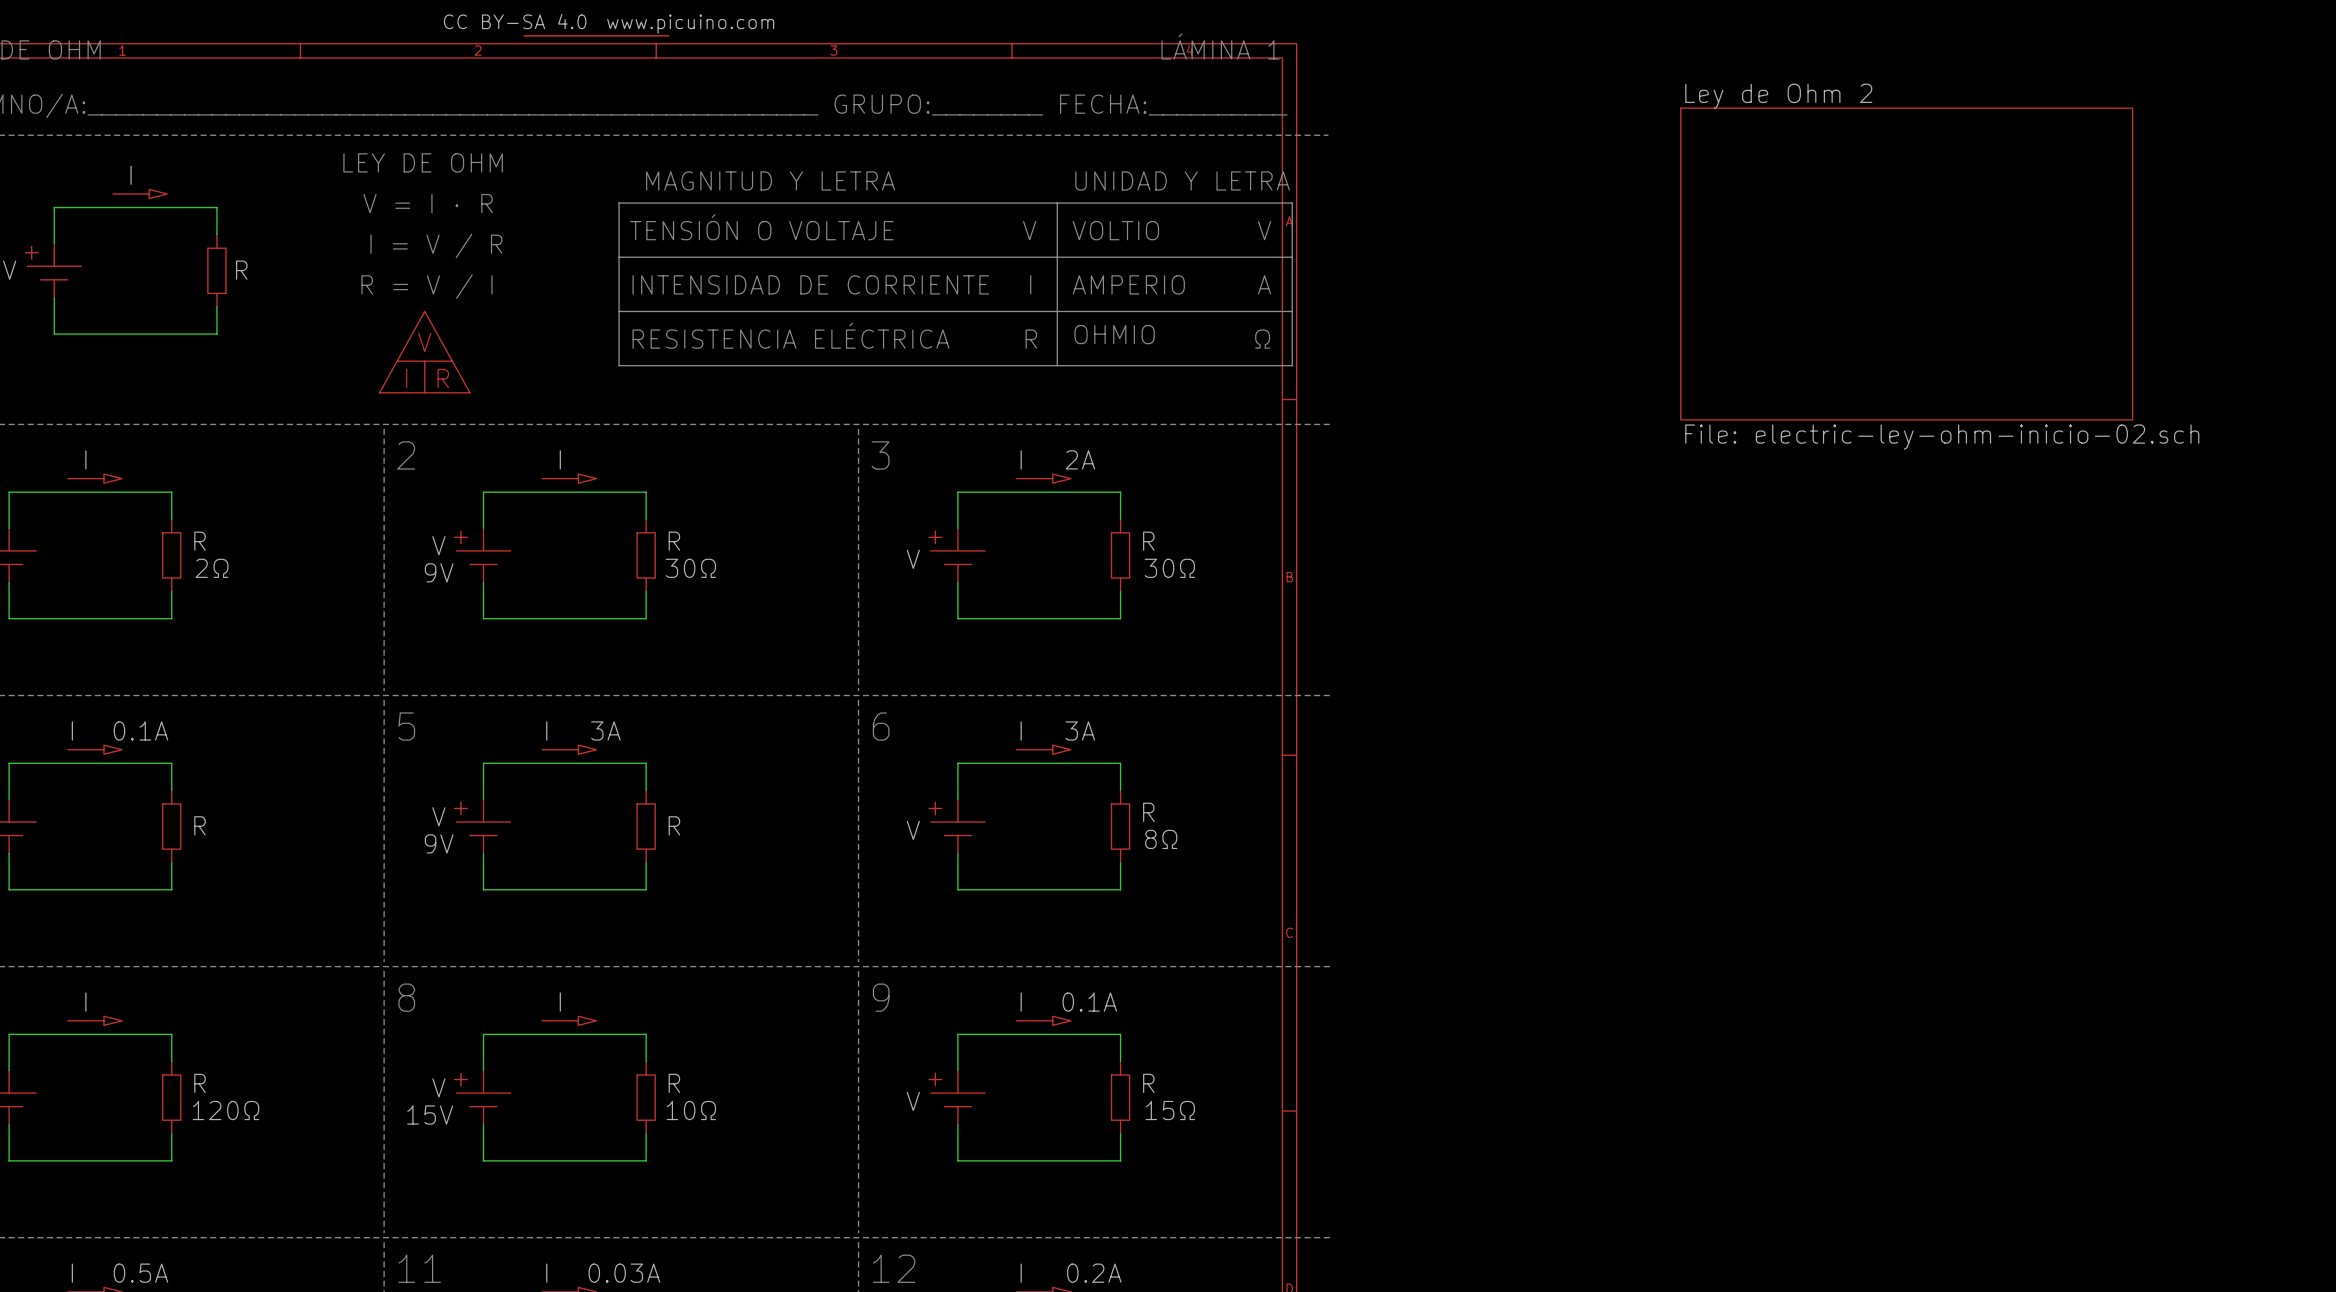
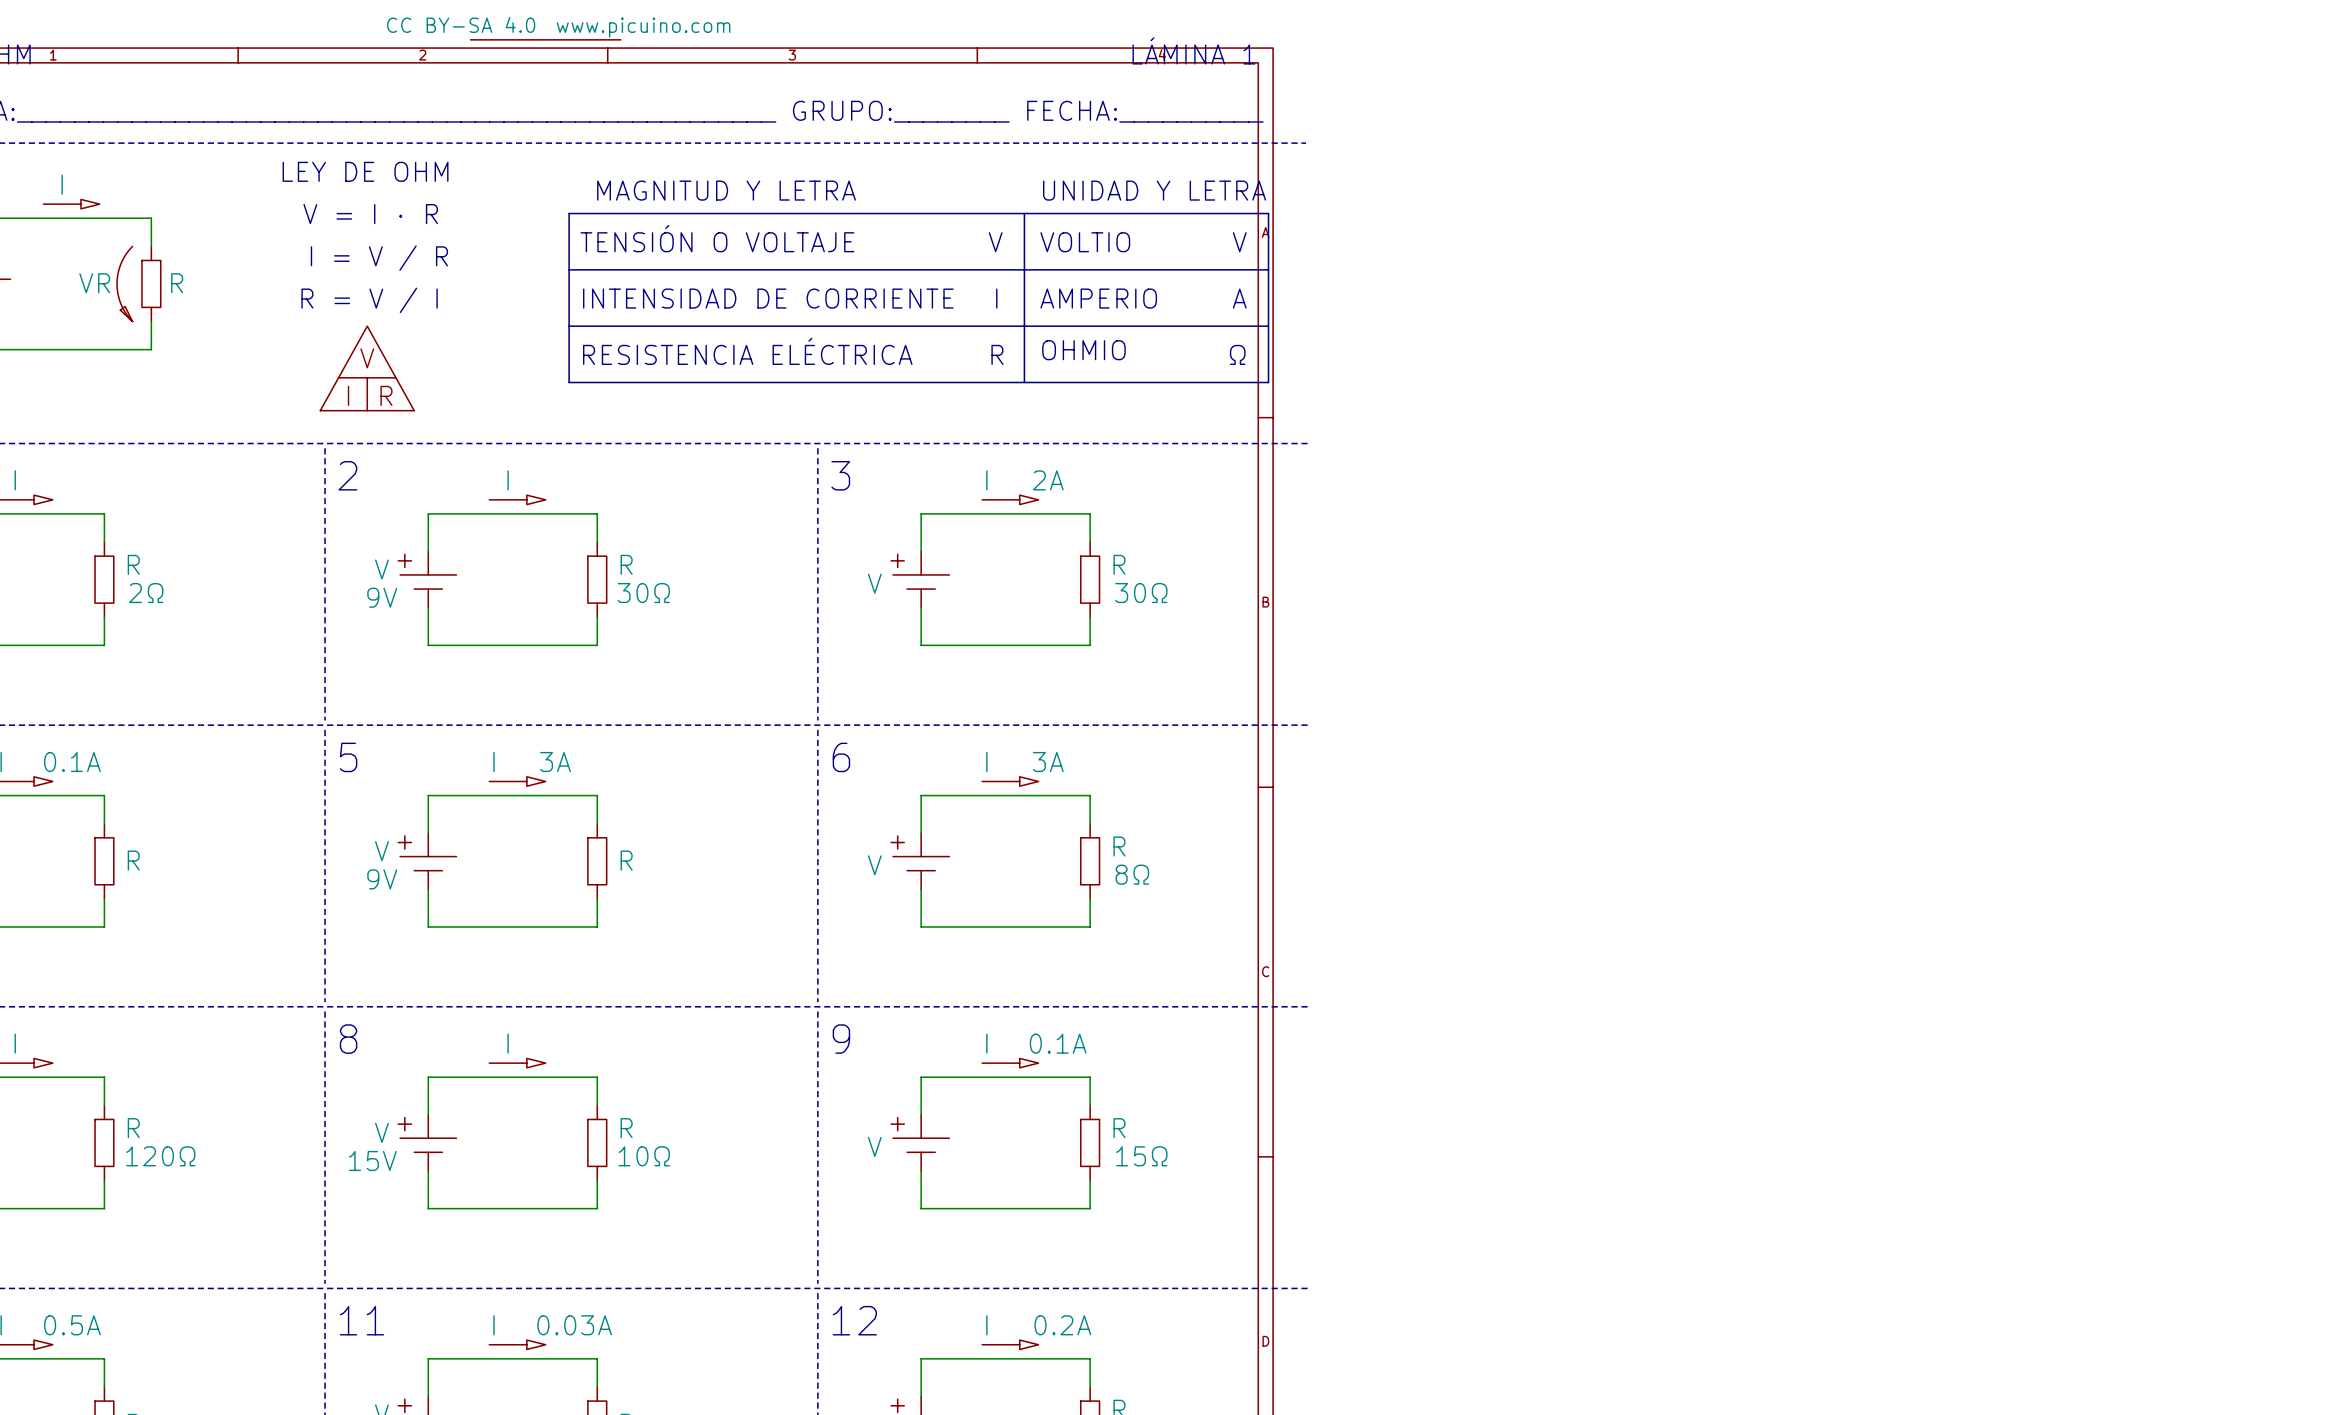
sheet Ley de Ohm 2: File: electric-ley-ohm-inicio-02.sch (1906, 264) -> none
VR: none -> (124, 283)

